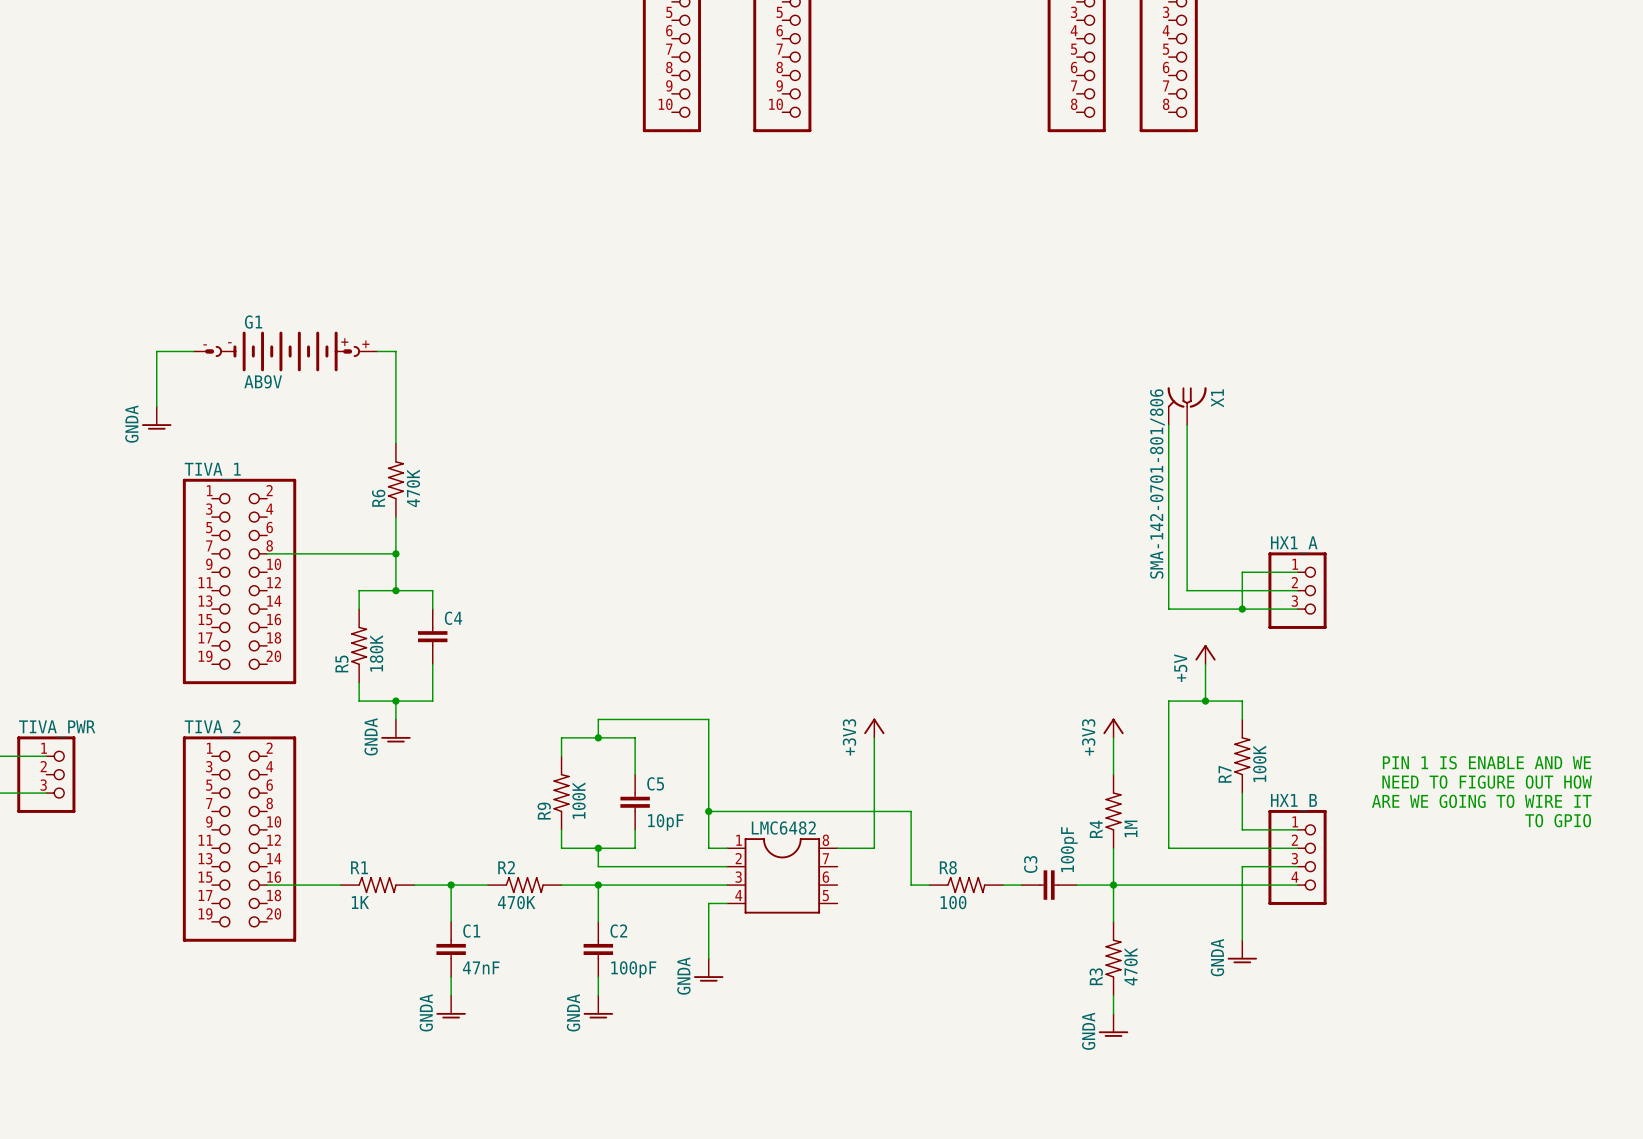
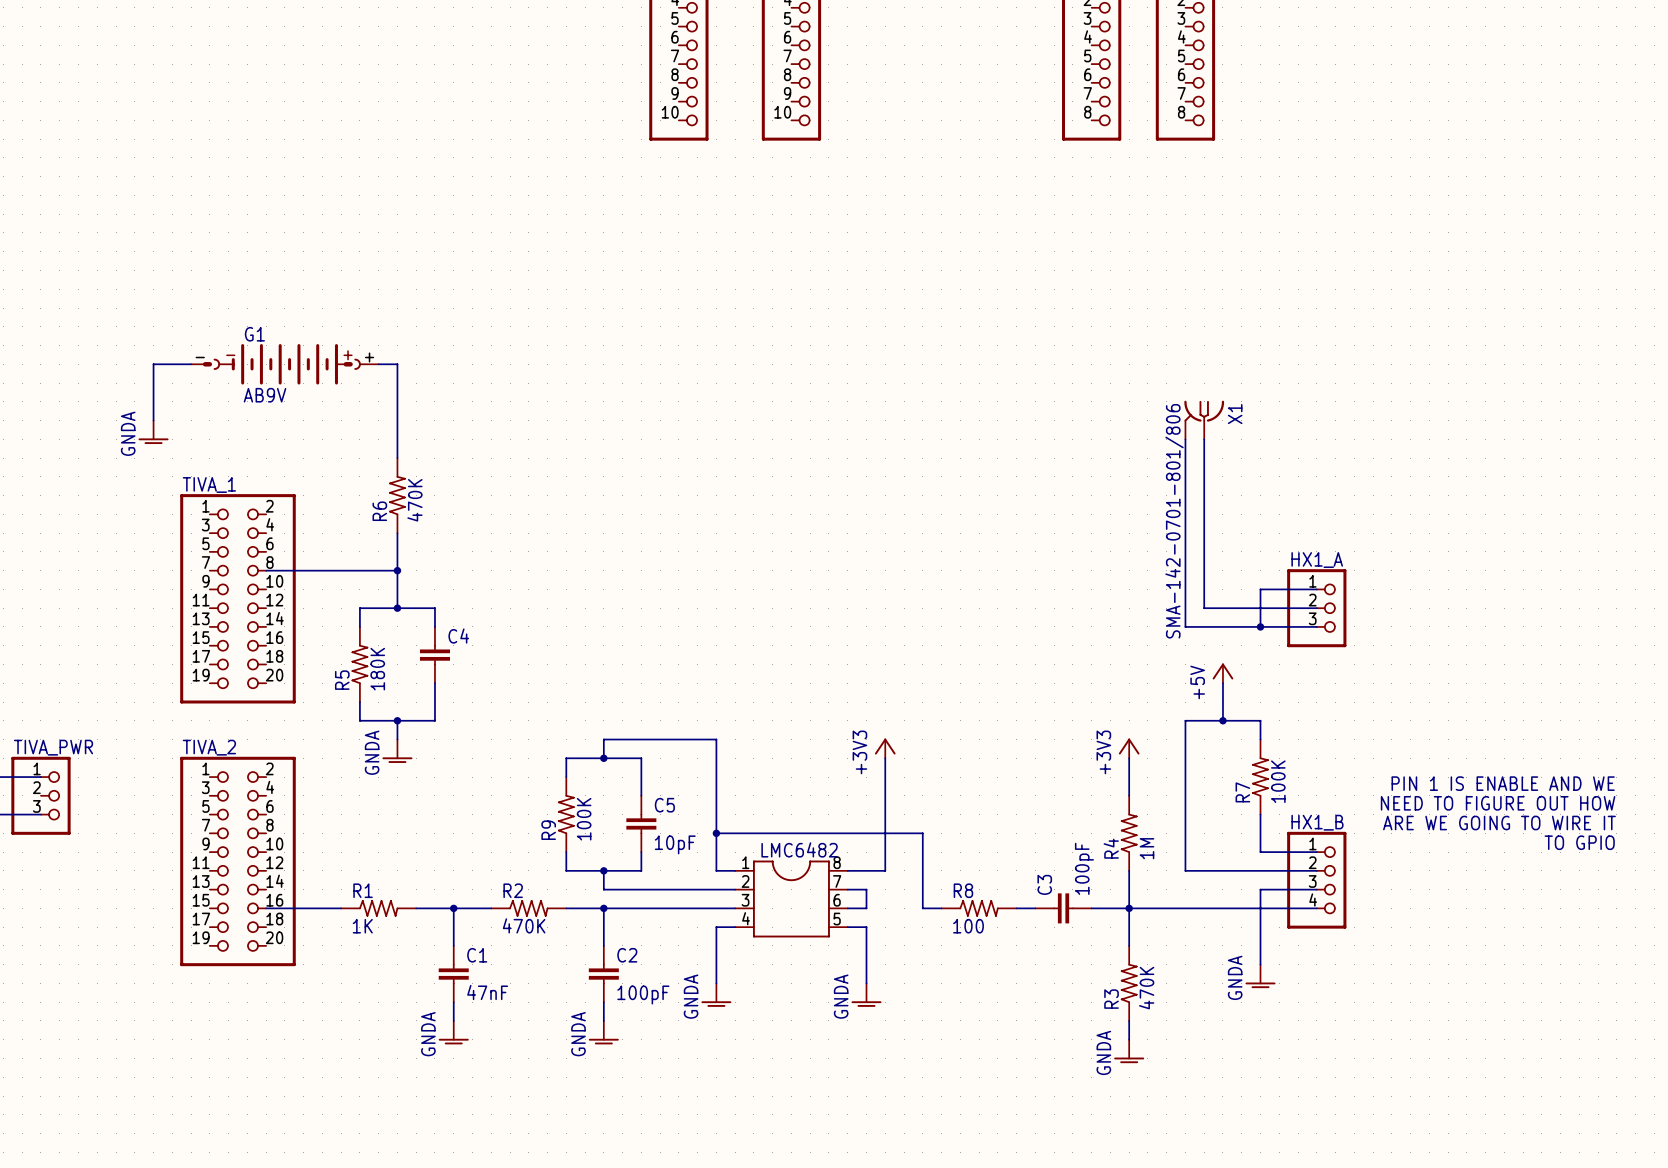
wire: none -> (847, 889) (866, 889) (866, 908) (847, 908)
wire: none -> (847, 927) (866, 927) (866, 983)
power symbol: none -> GNDA (866, 995)

